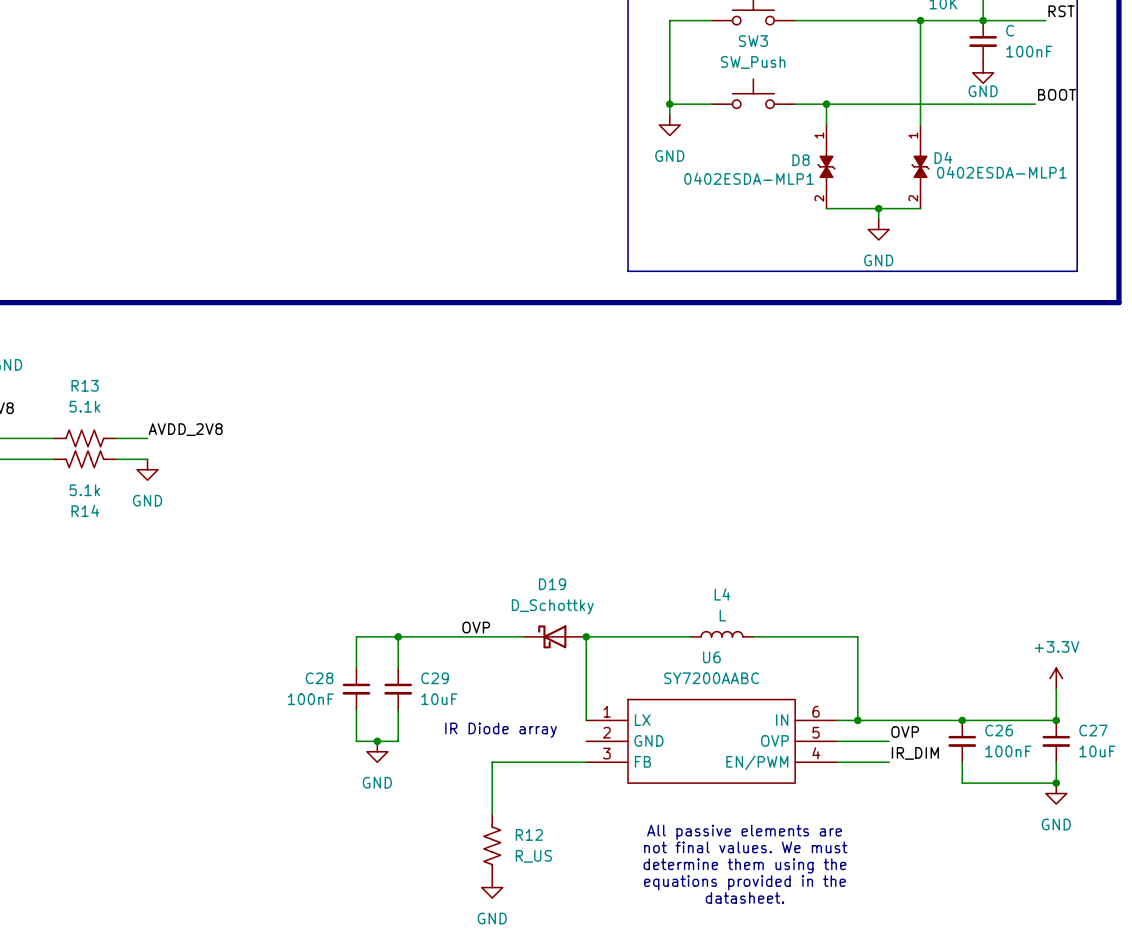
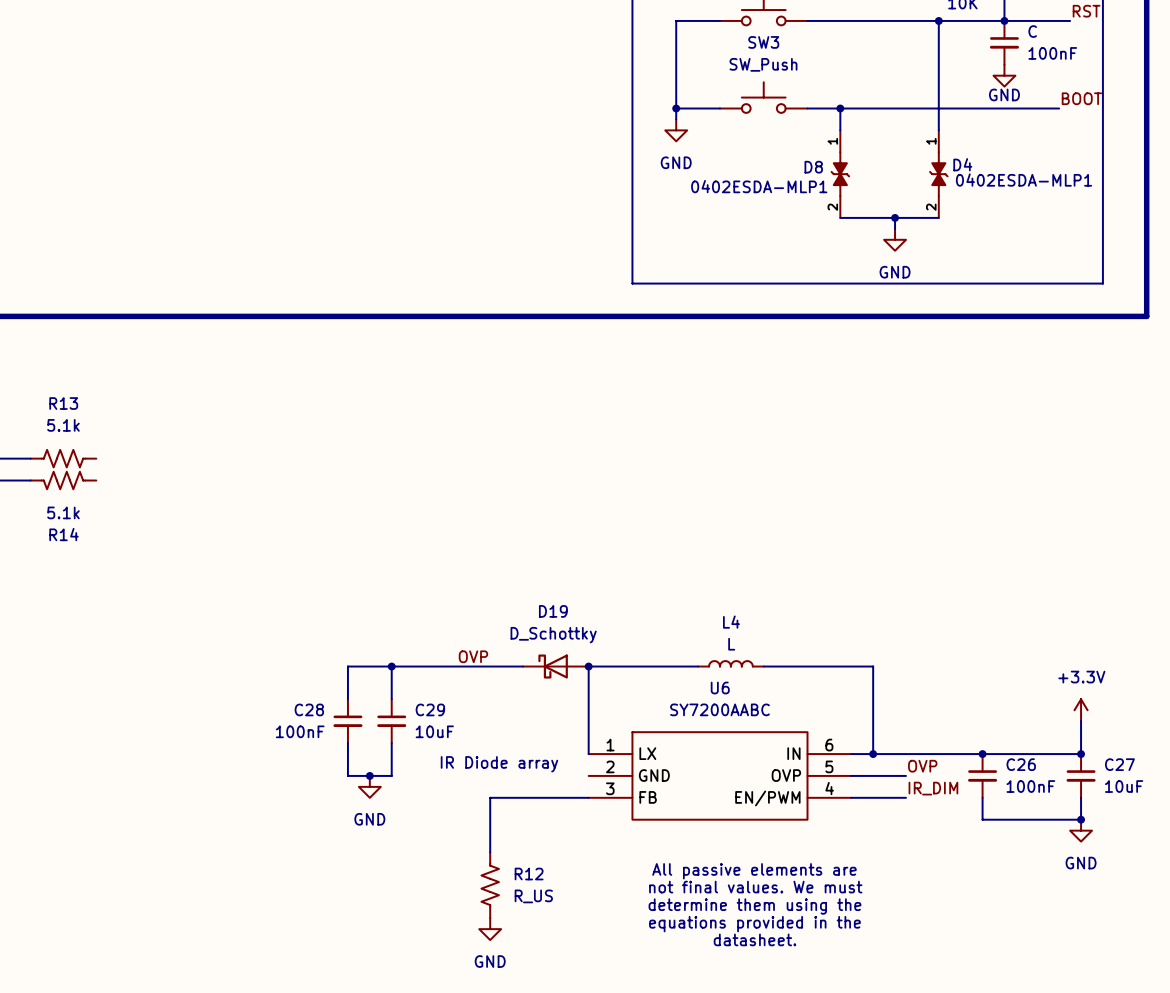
label: AVDD_2V8 (185, 429) -> none
wire: (116, 438) (147, 438) -> none
wire: (116, 459) (147, 459) -> none
power symbol: GND (147, 469) -> none

